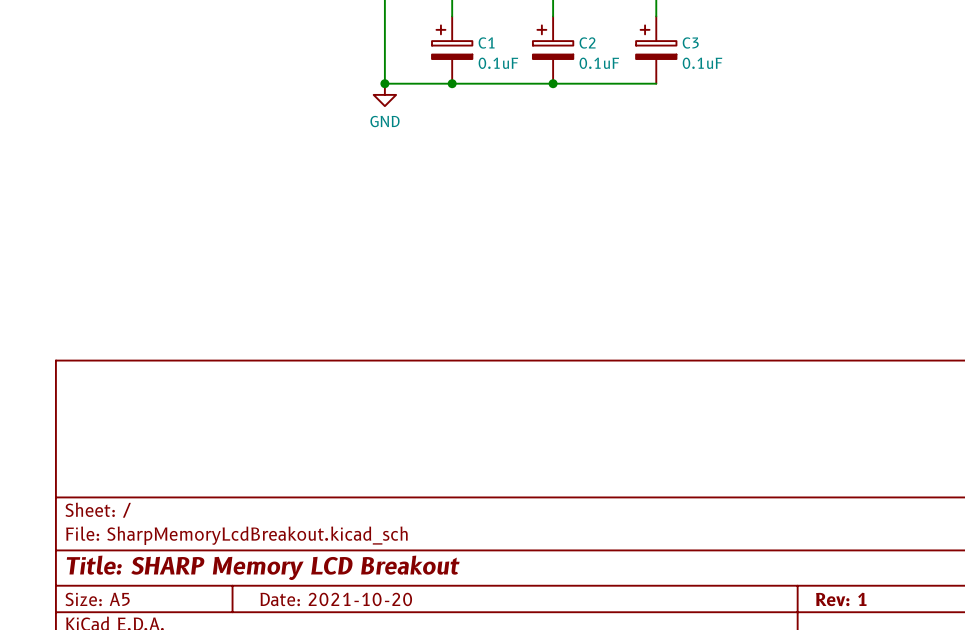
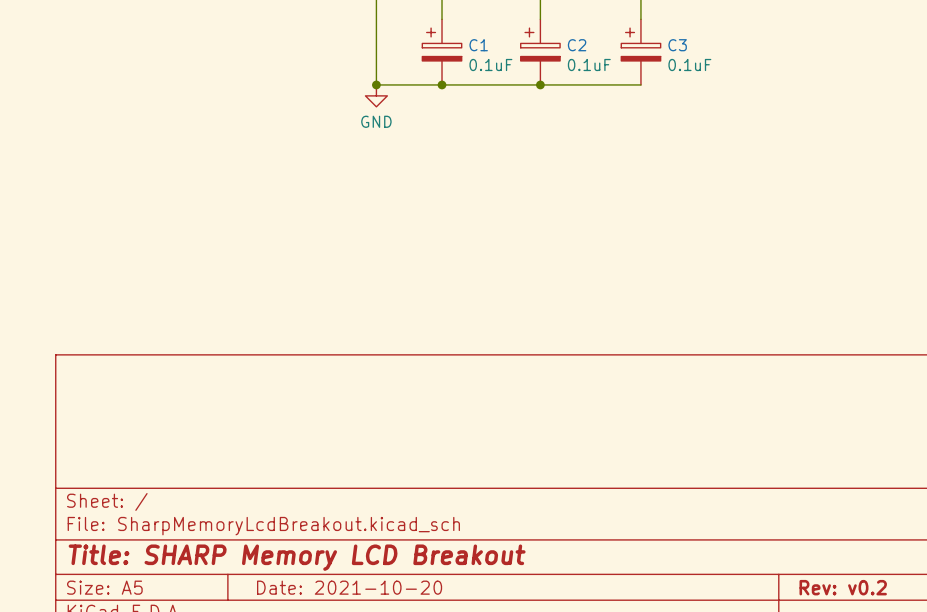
title block: Rev: 1 (841, 599) -> Rev: v0.2 (843, 587)

